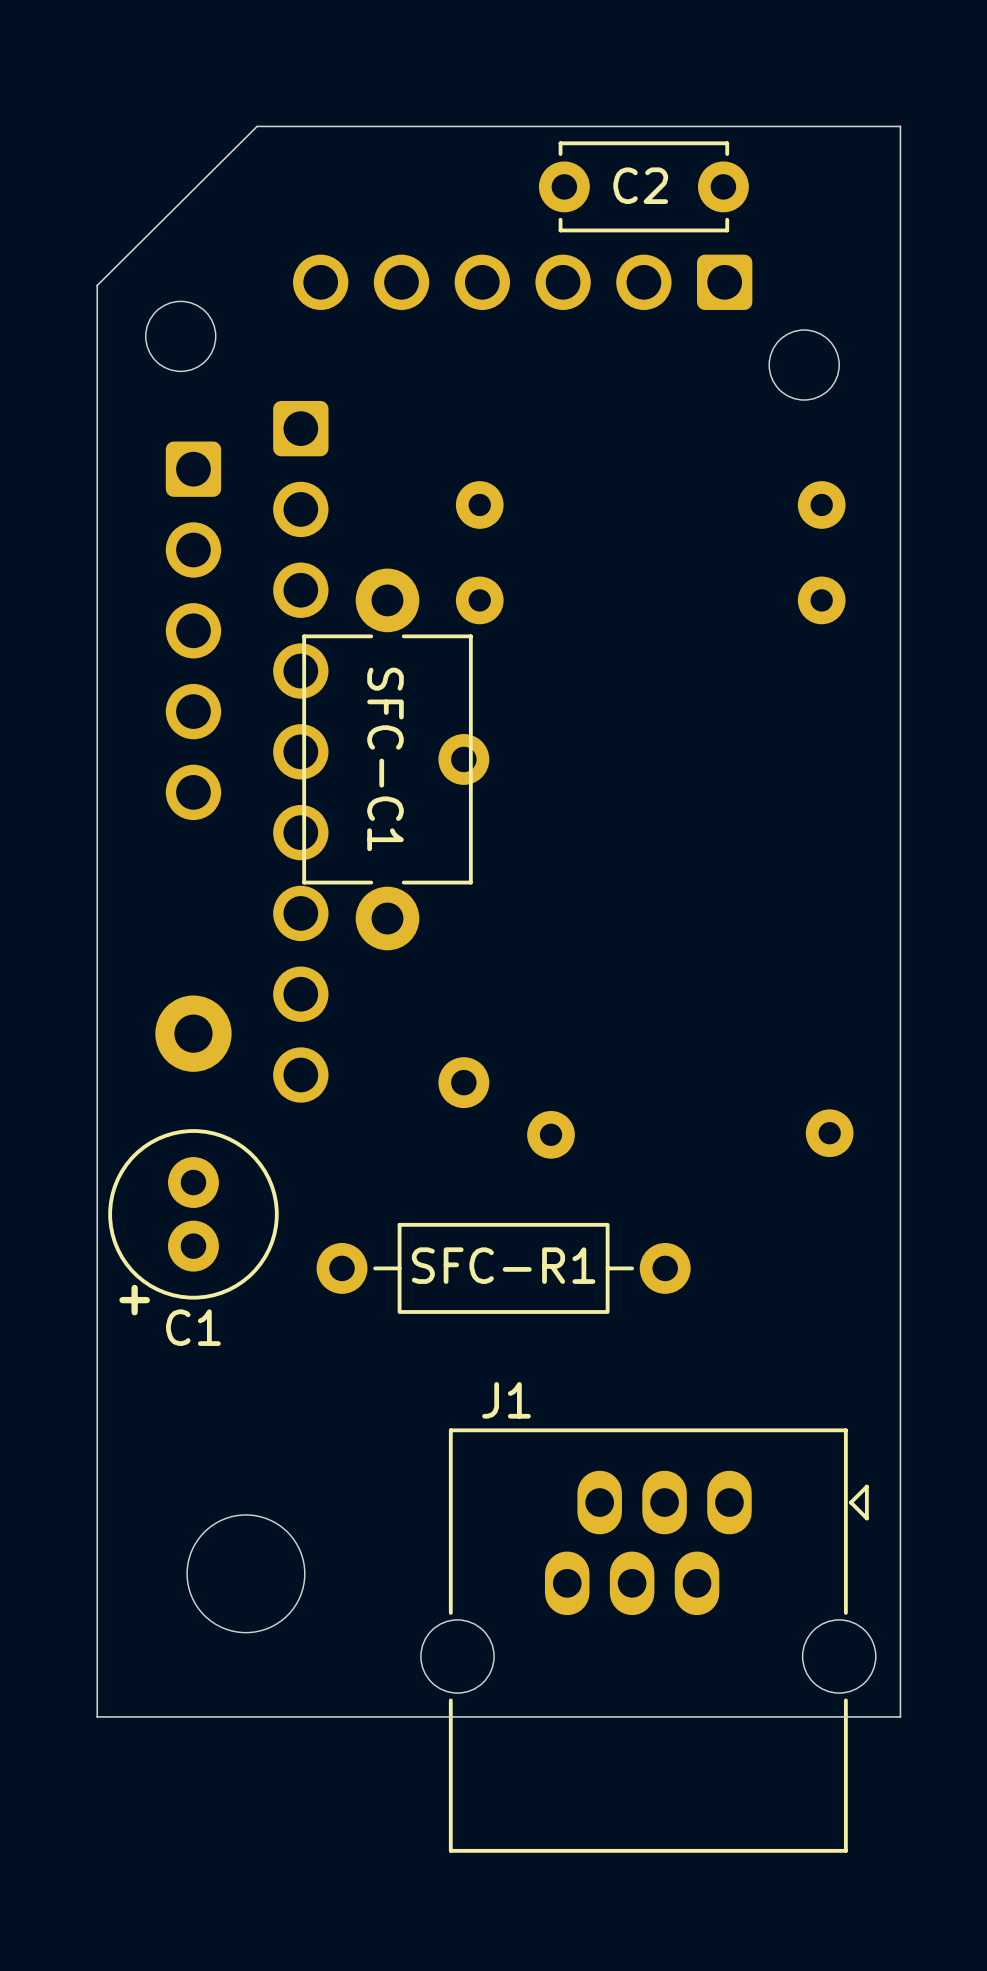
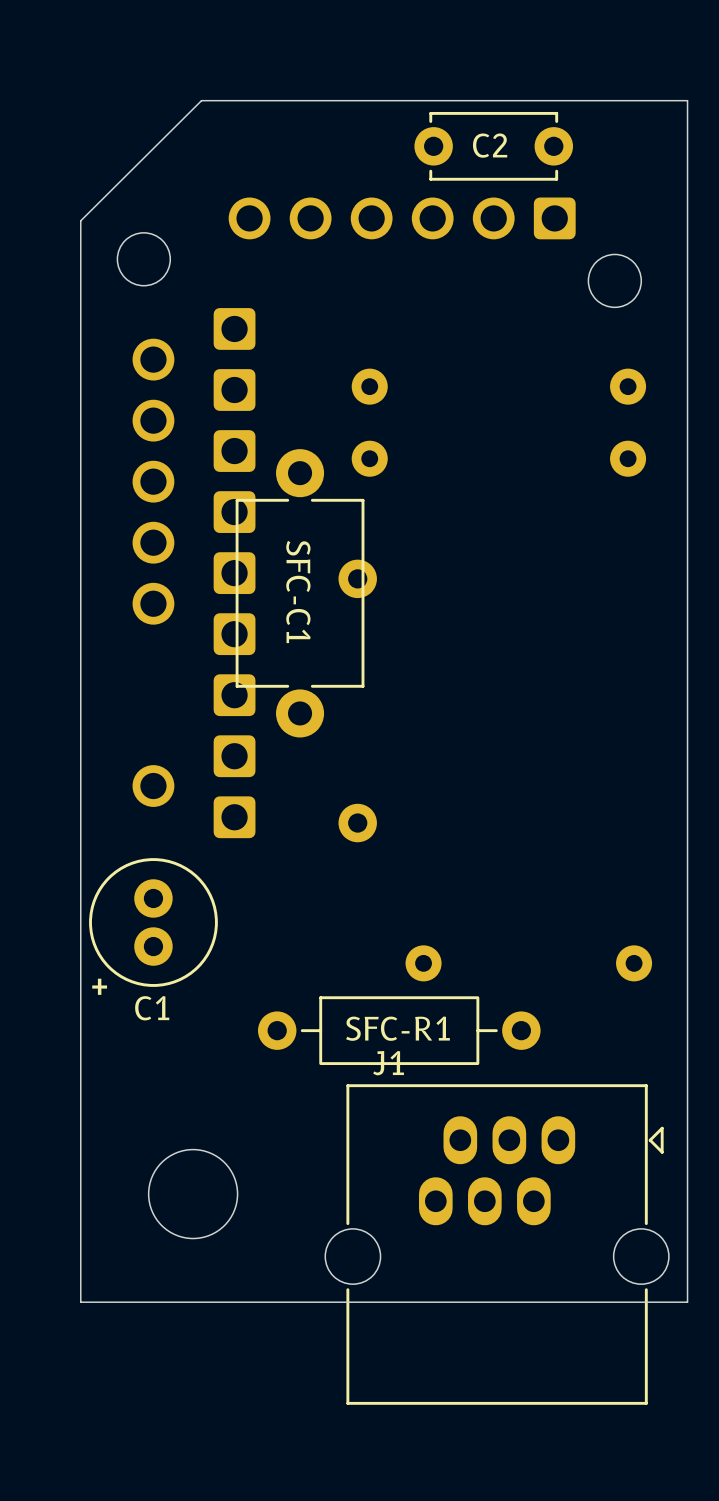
part footprint: [273, 400, 329, 1103] -> [213, 308, 256, 839]
part footprint: [165, 441, 222, 821] -> [132, 338, 175, 625]
SFC-C1 position: (387, 759) -> (300, 593)
part footprint: [155, 995, 232, 1072] -> [132, 765, 175, 807]
part position: (829, 1133) -> (634, 963)
part position: (551, 1134) -> (423, 963)
SFC-R1 position: (503, 1268) -> (399, 1030)

